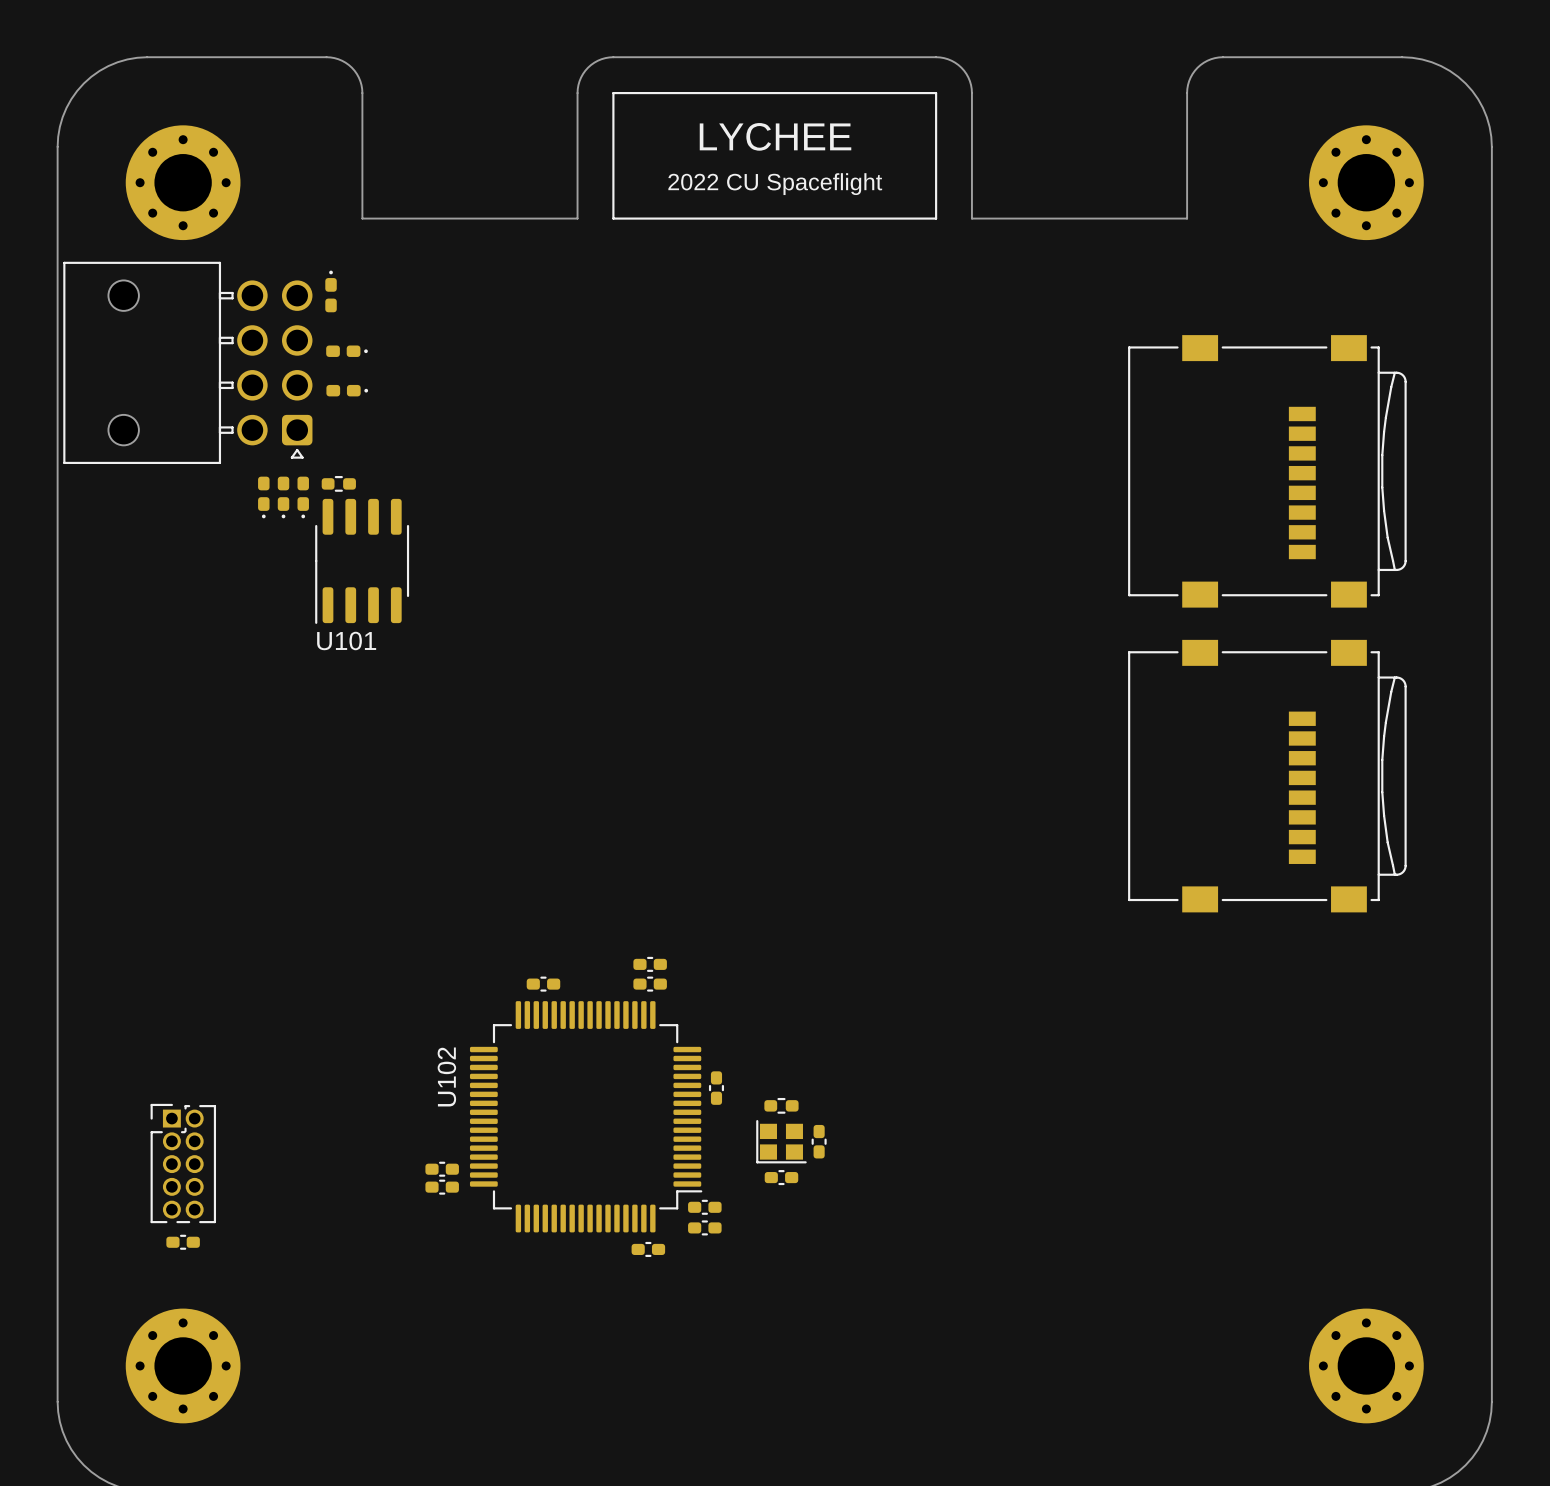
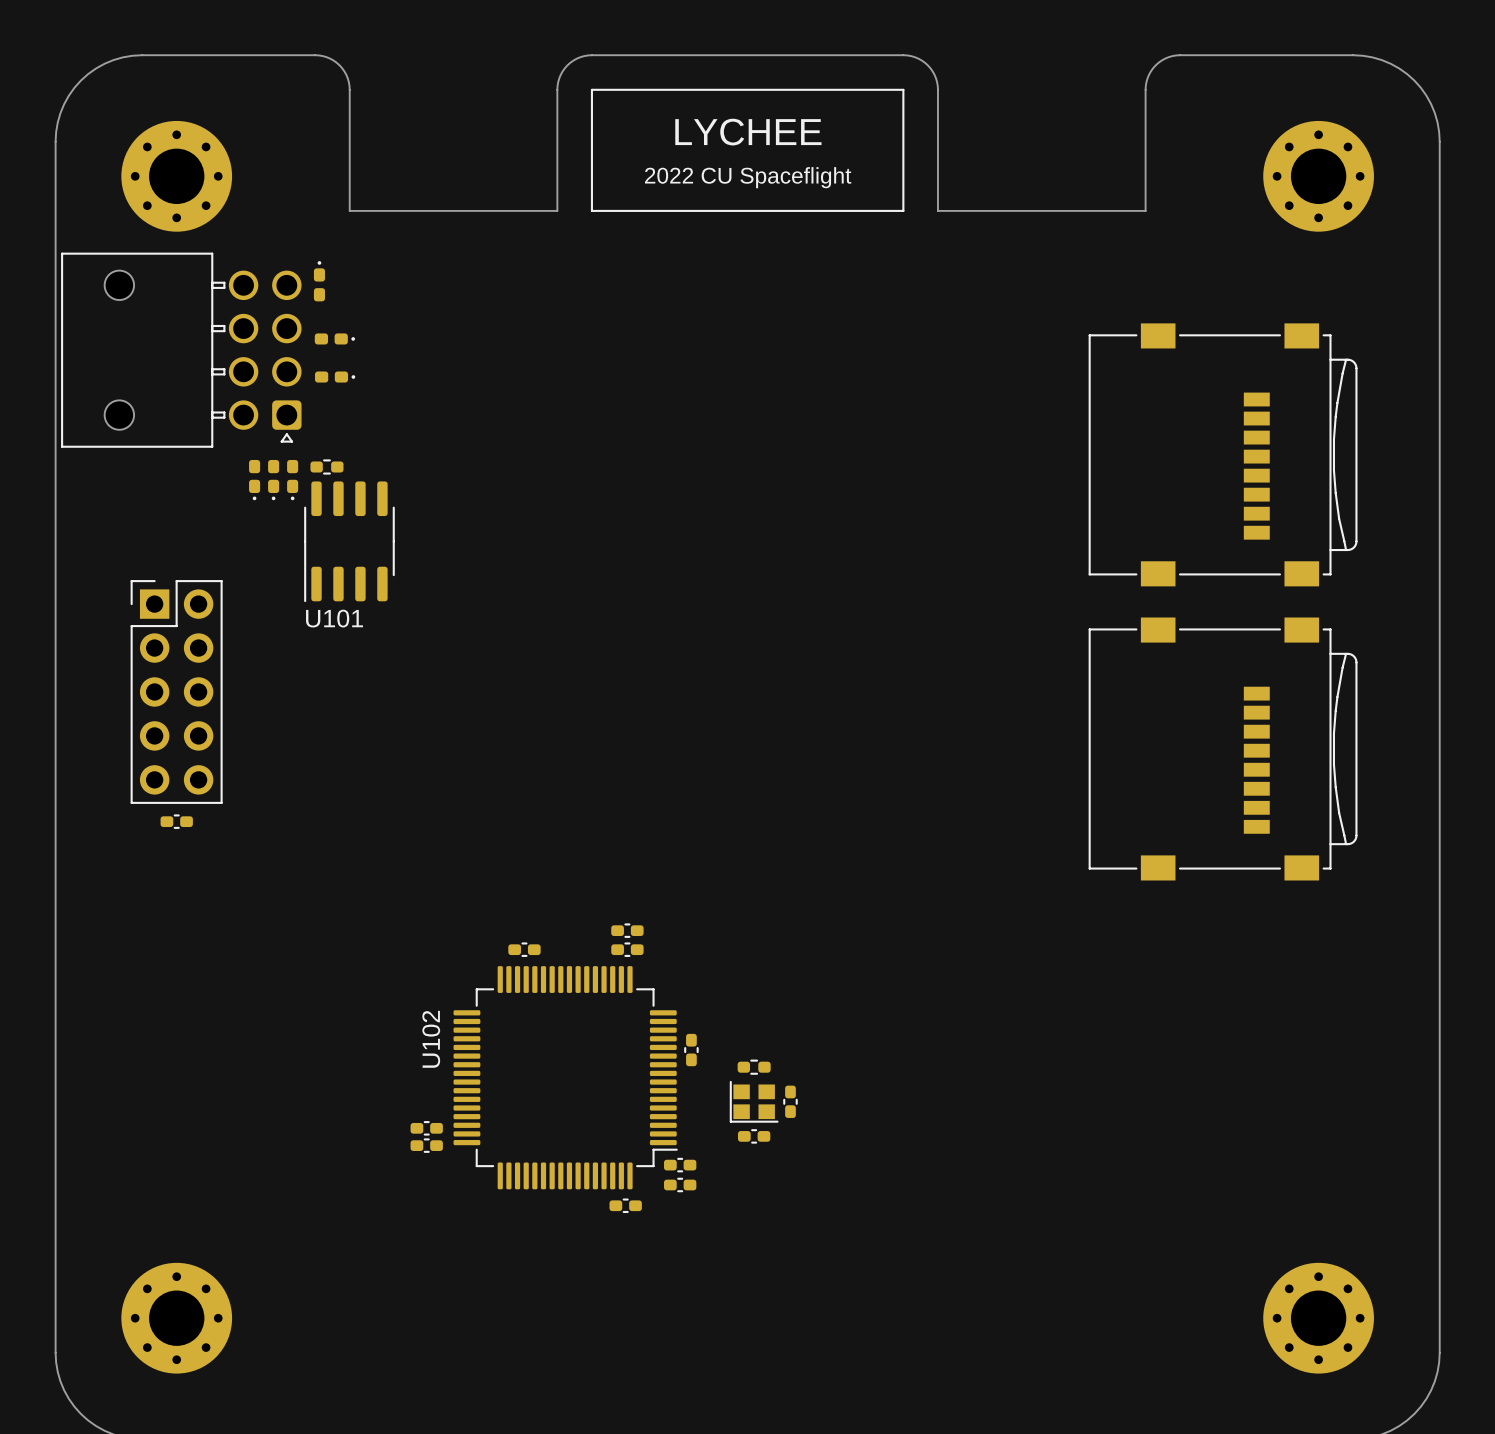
part: none -> (176, 691)
part: (183, 1163) -> none
part position: (183, 1242) -> (176, 821)

